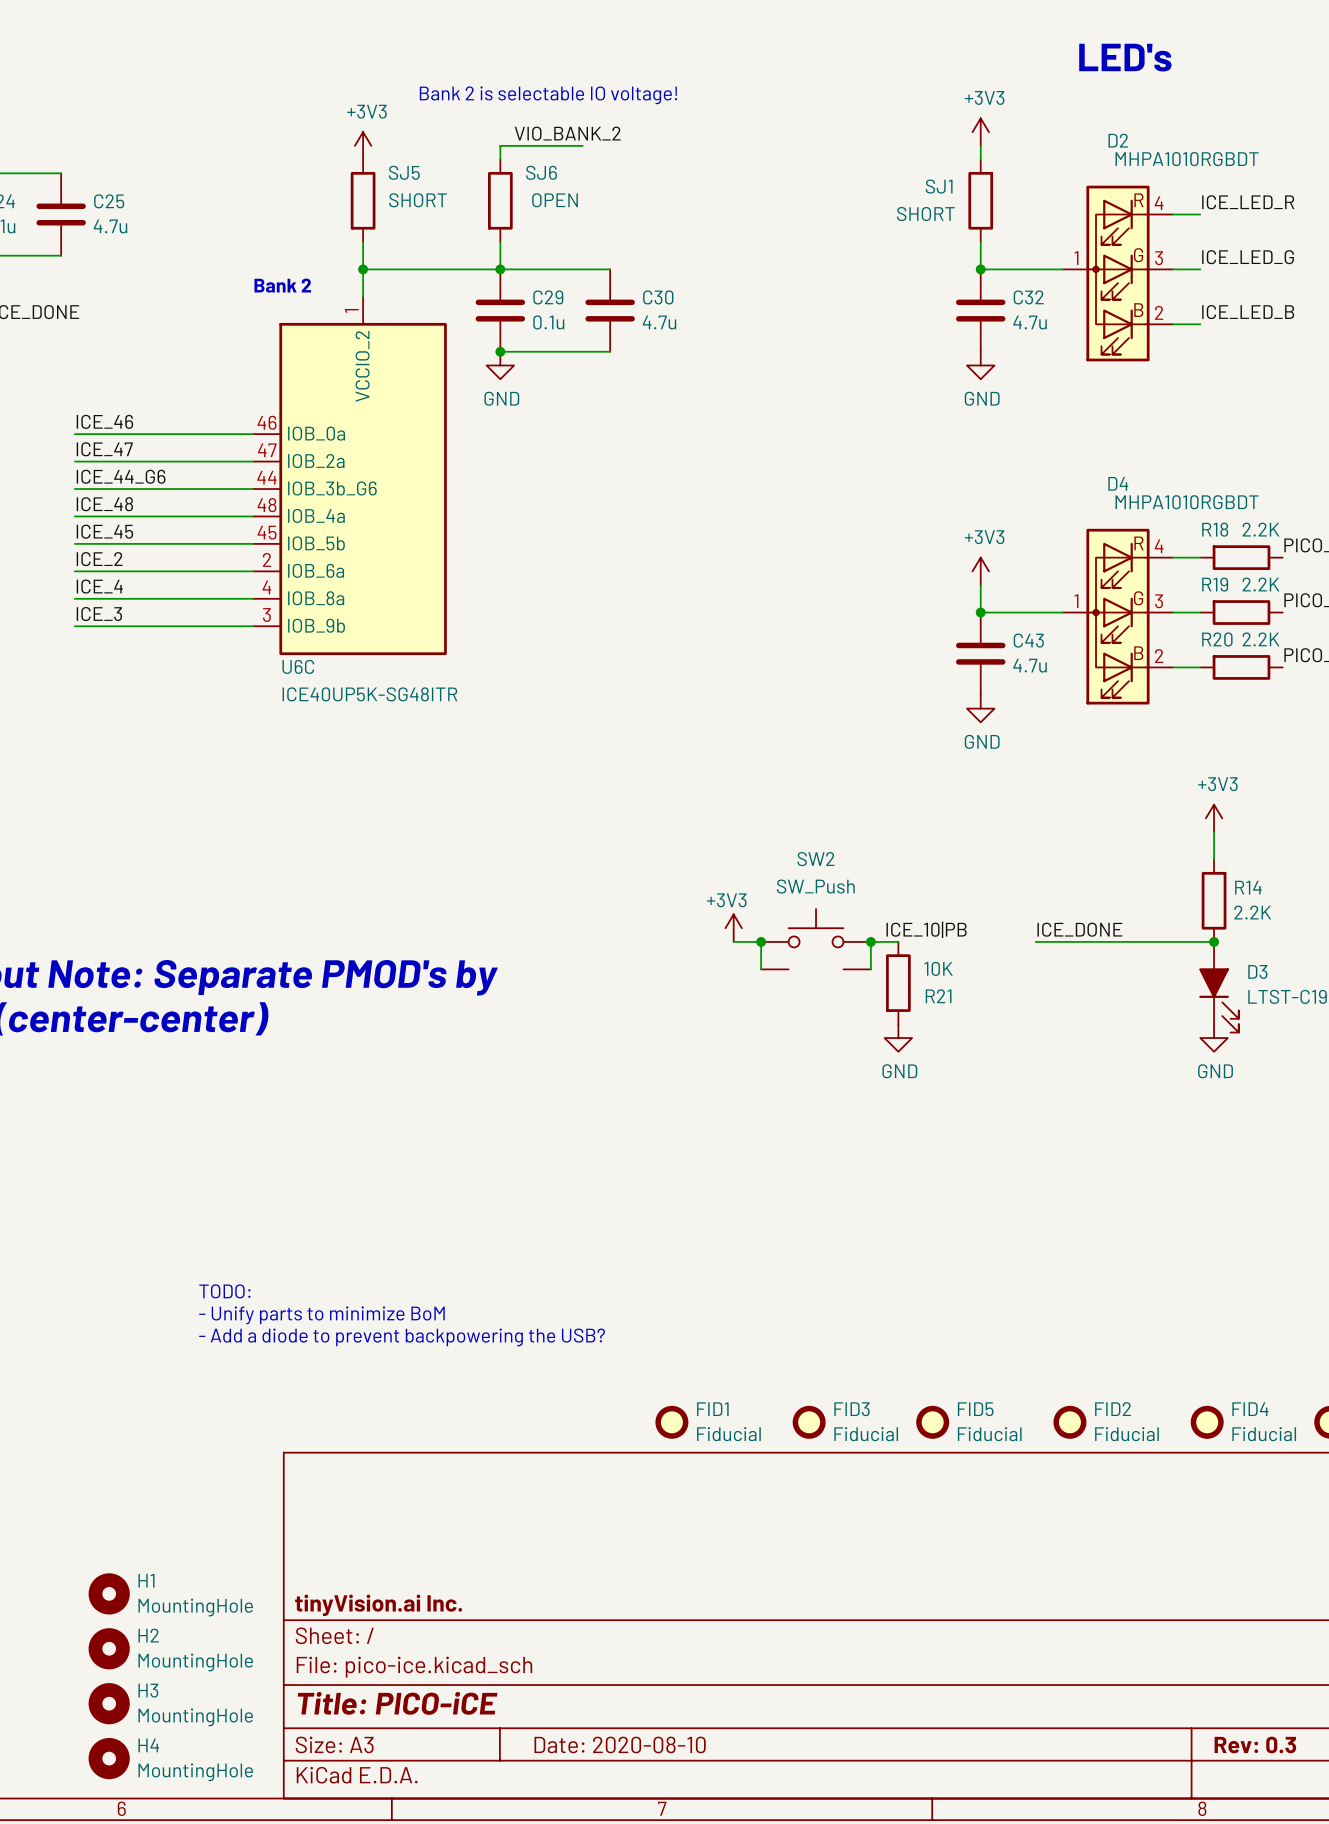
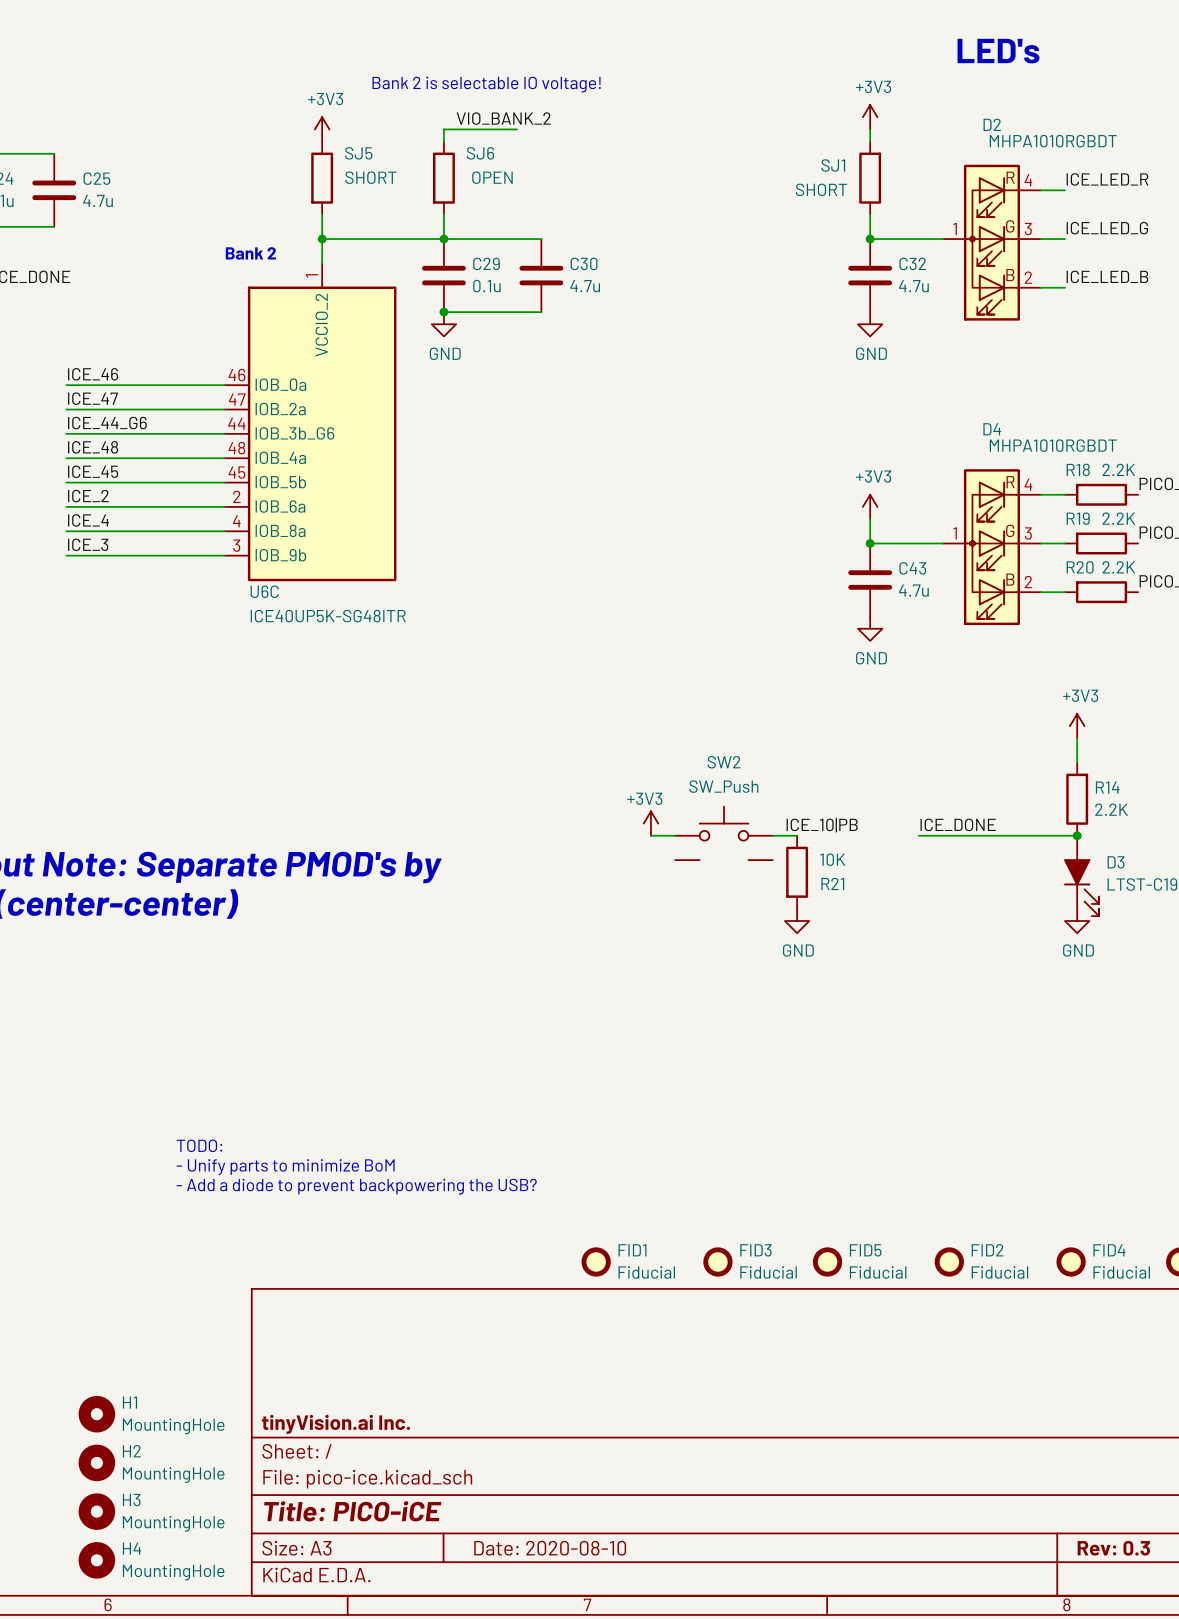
wire: (761, 941) (761, 969) -> none
junction: (761, 941) -> none
wire: (870, 941) (870, 969) -> none
junction: (870, 941) -> none

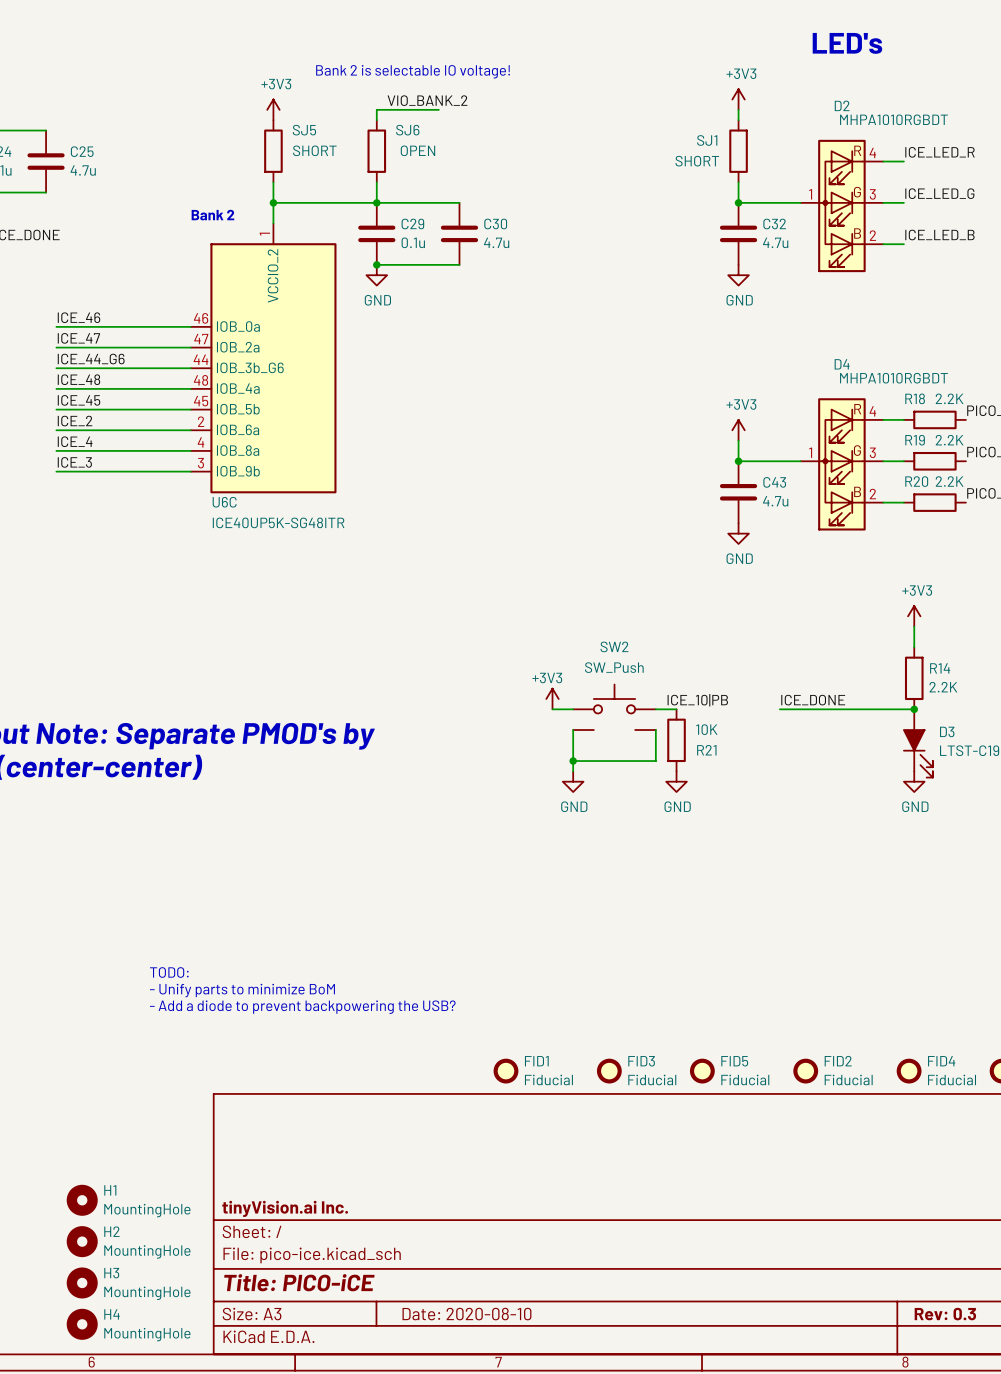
wire: none -> (573, 730) (573, 771)
wire: none -> (655, 730) (655, 761) (573, 761)
junction: none -> (573, 761)
power symbol: none -> GND (573, 781)

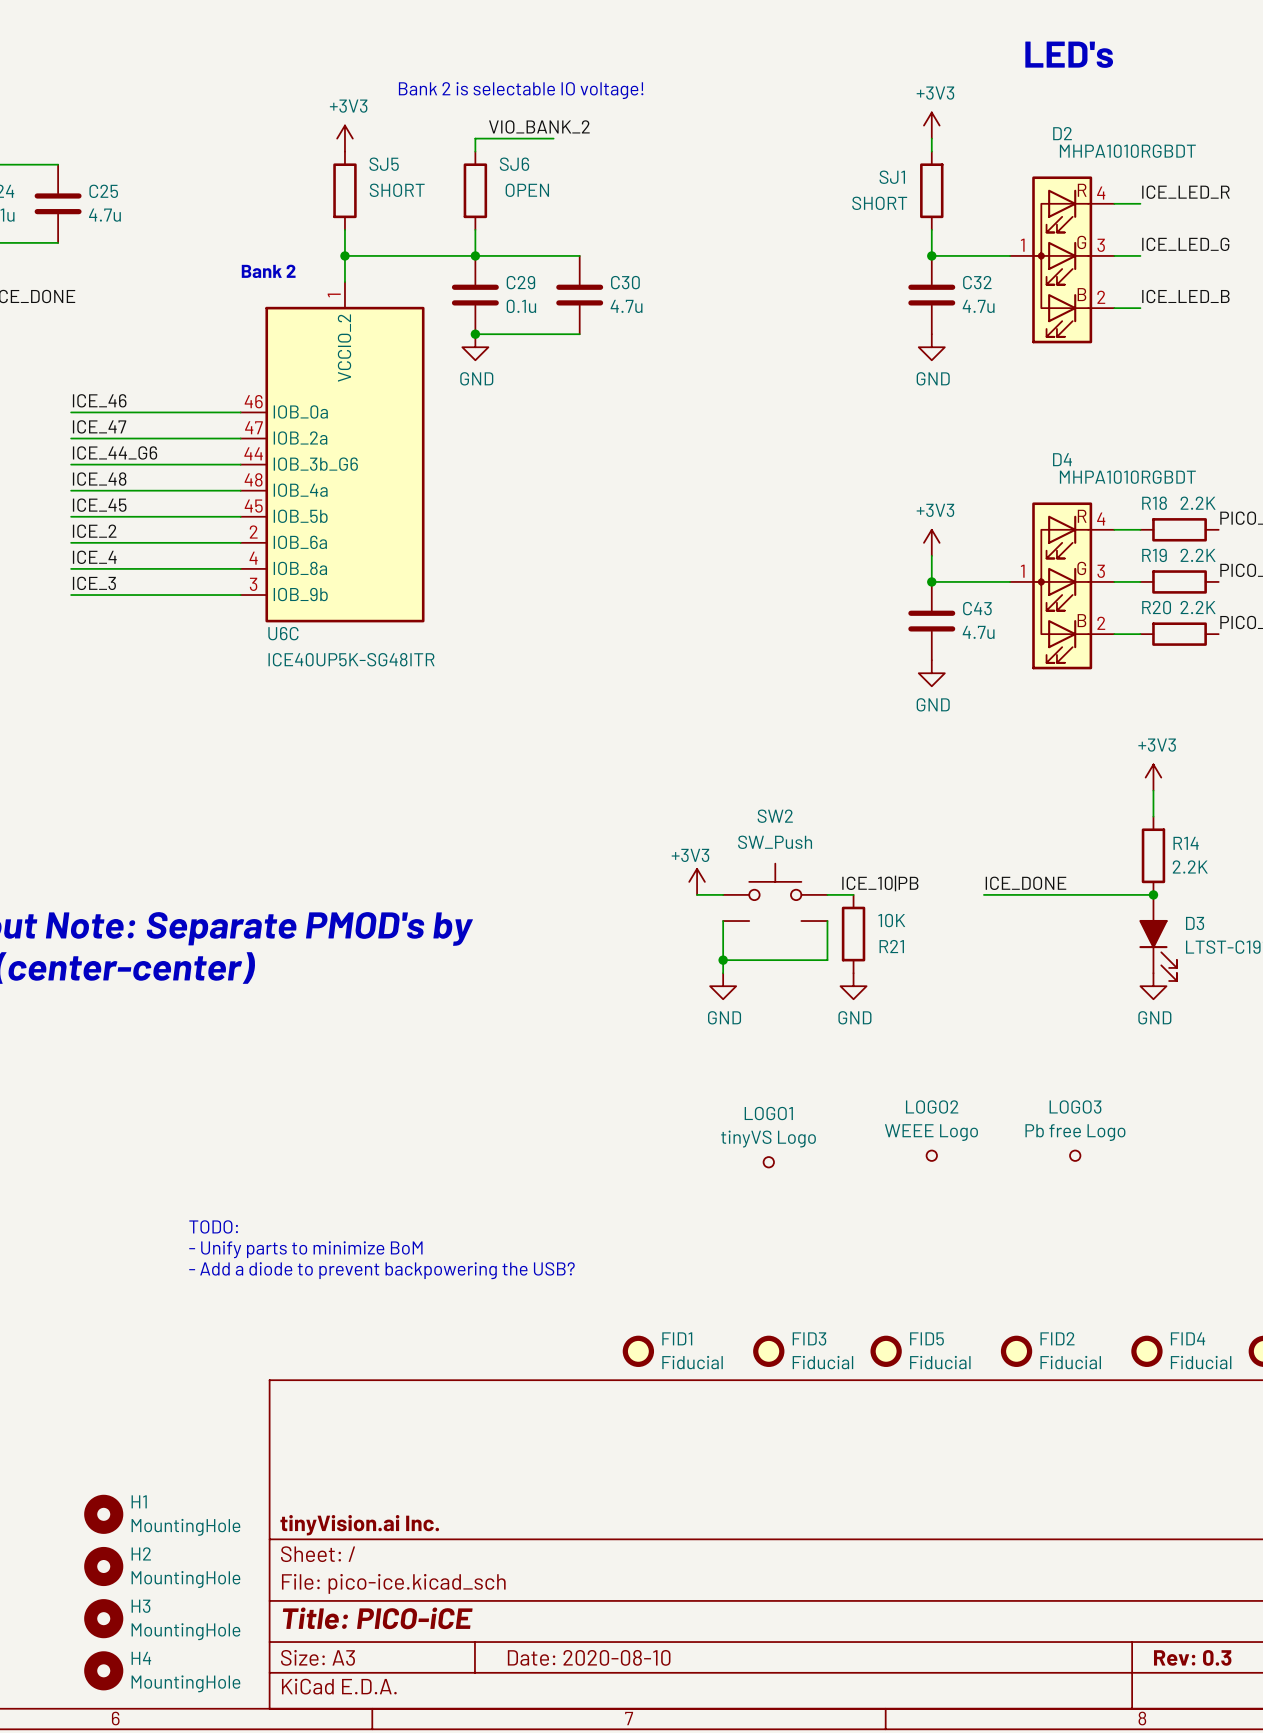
LOGO2: none -> WEEE Logo (931, 1155)
LOGO3: none -> Pb free Logo (1075, 1155)
LOGO1: none -> tinyVS Logo (768, 1162)

